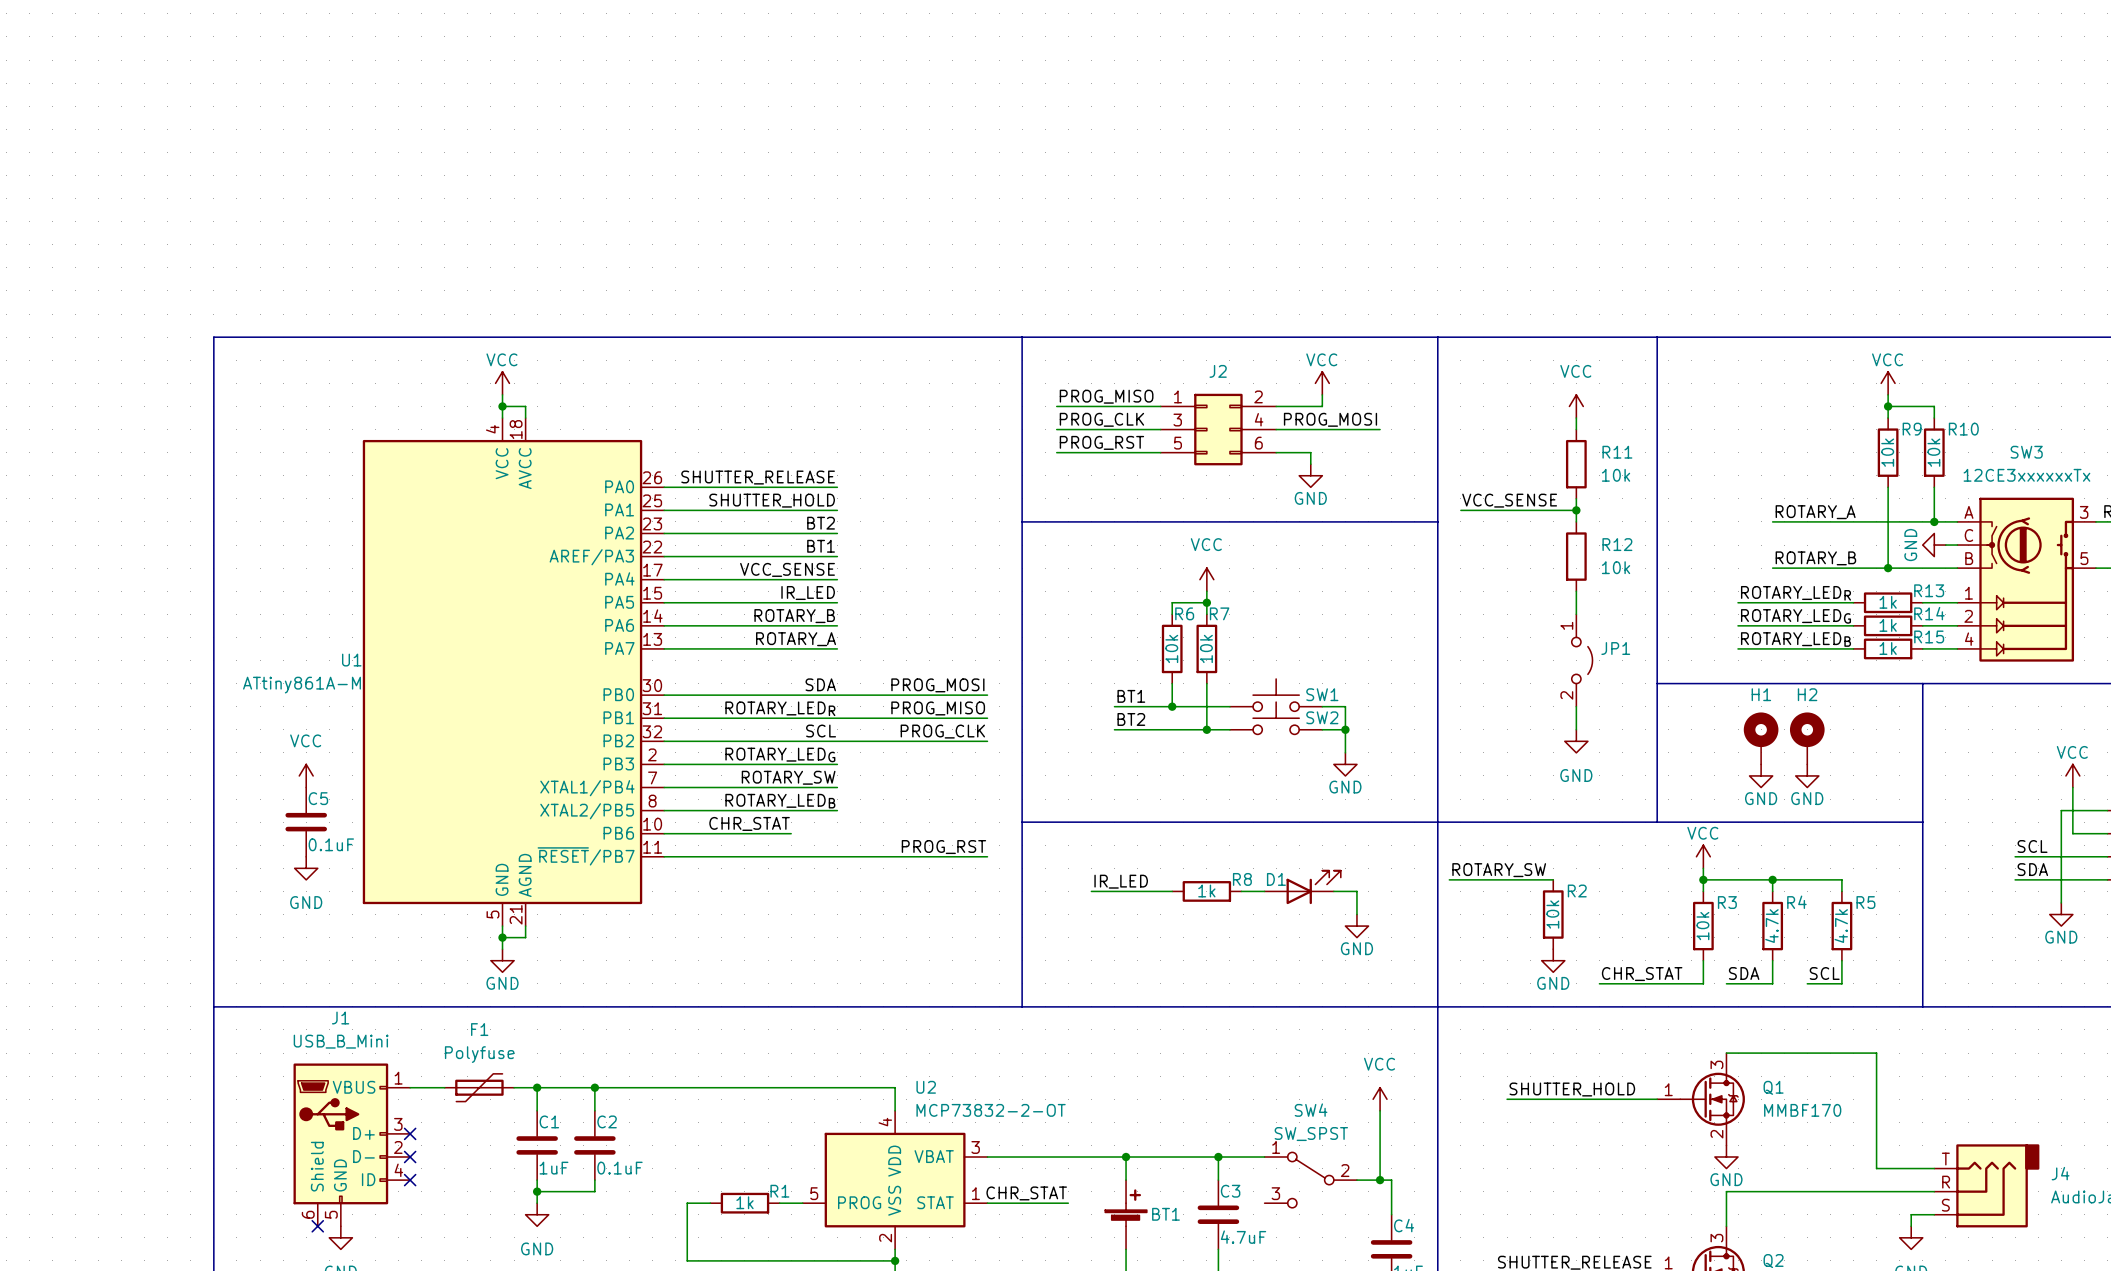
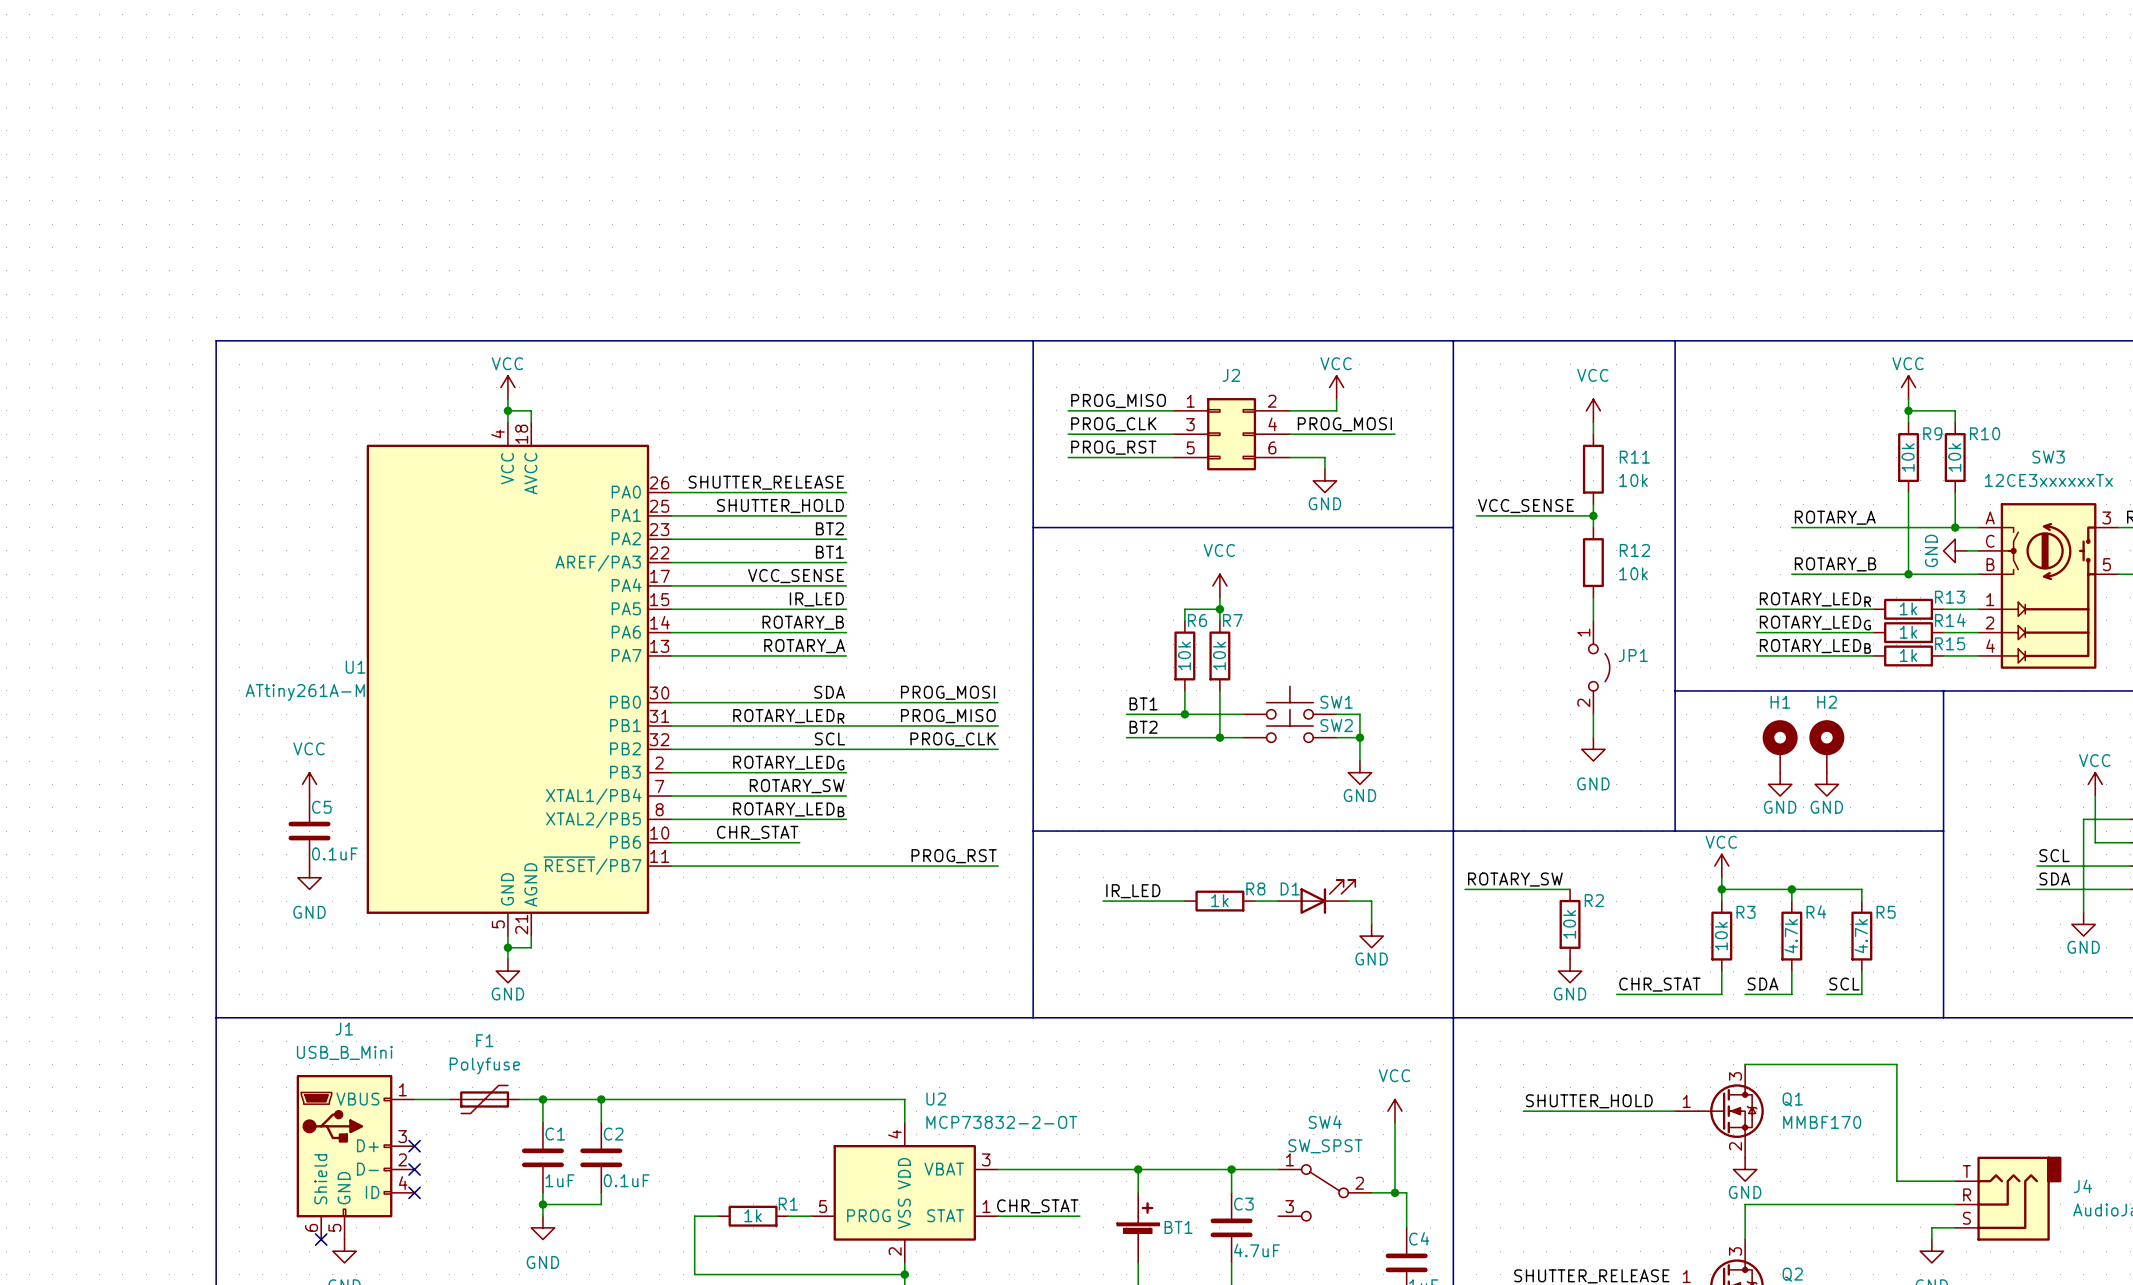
SW3 symbol: [1957, 497, 2096, 662] -> [1978, 503, 2119, 669]
U1 value: ATtiny861A-M (302, 685) -> ATtiny261A-M (305, 692)

